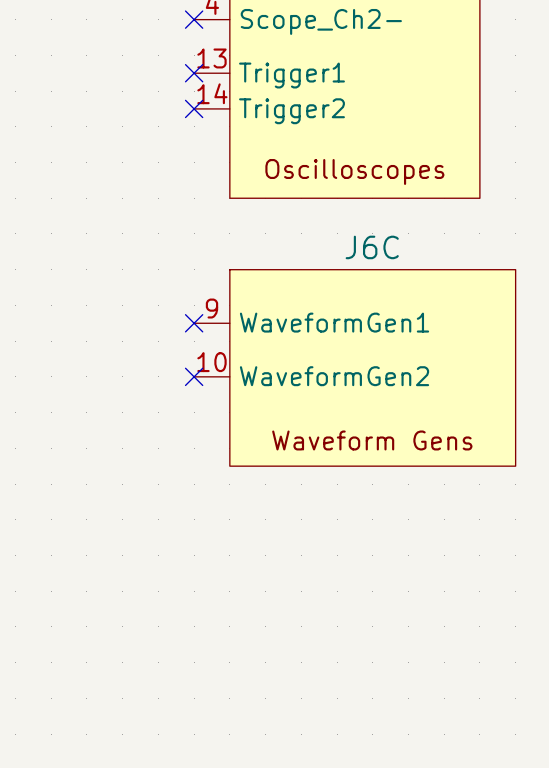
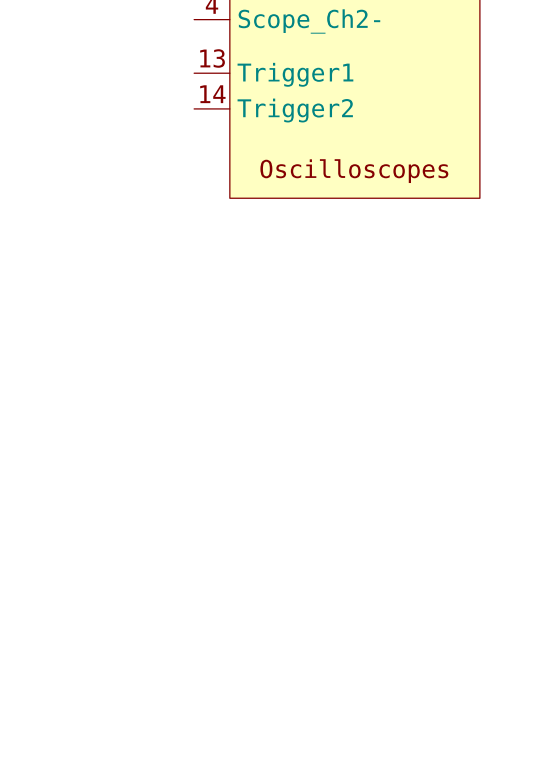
no-connect mark: (194, 19) -> none
no-connect mark: (194, 73) -> none
no-connect mark: (194, 108) -> none
no-connect mark: (194, 323) -> none
J6C: (354, 367) -> none
no-connect mark: (194, 376) -> none

